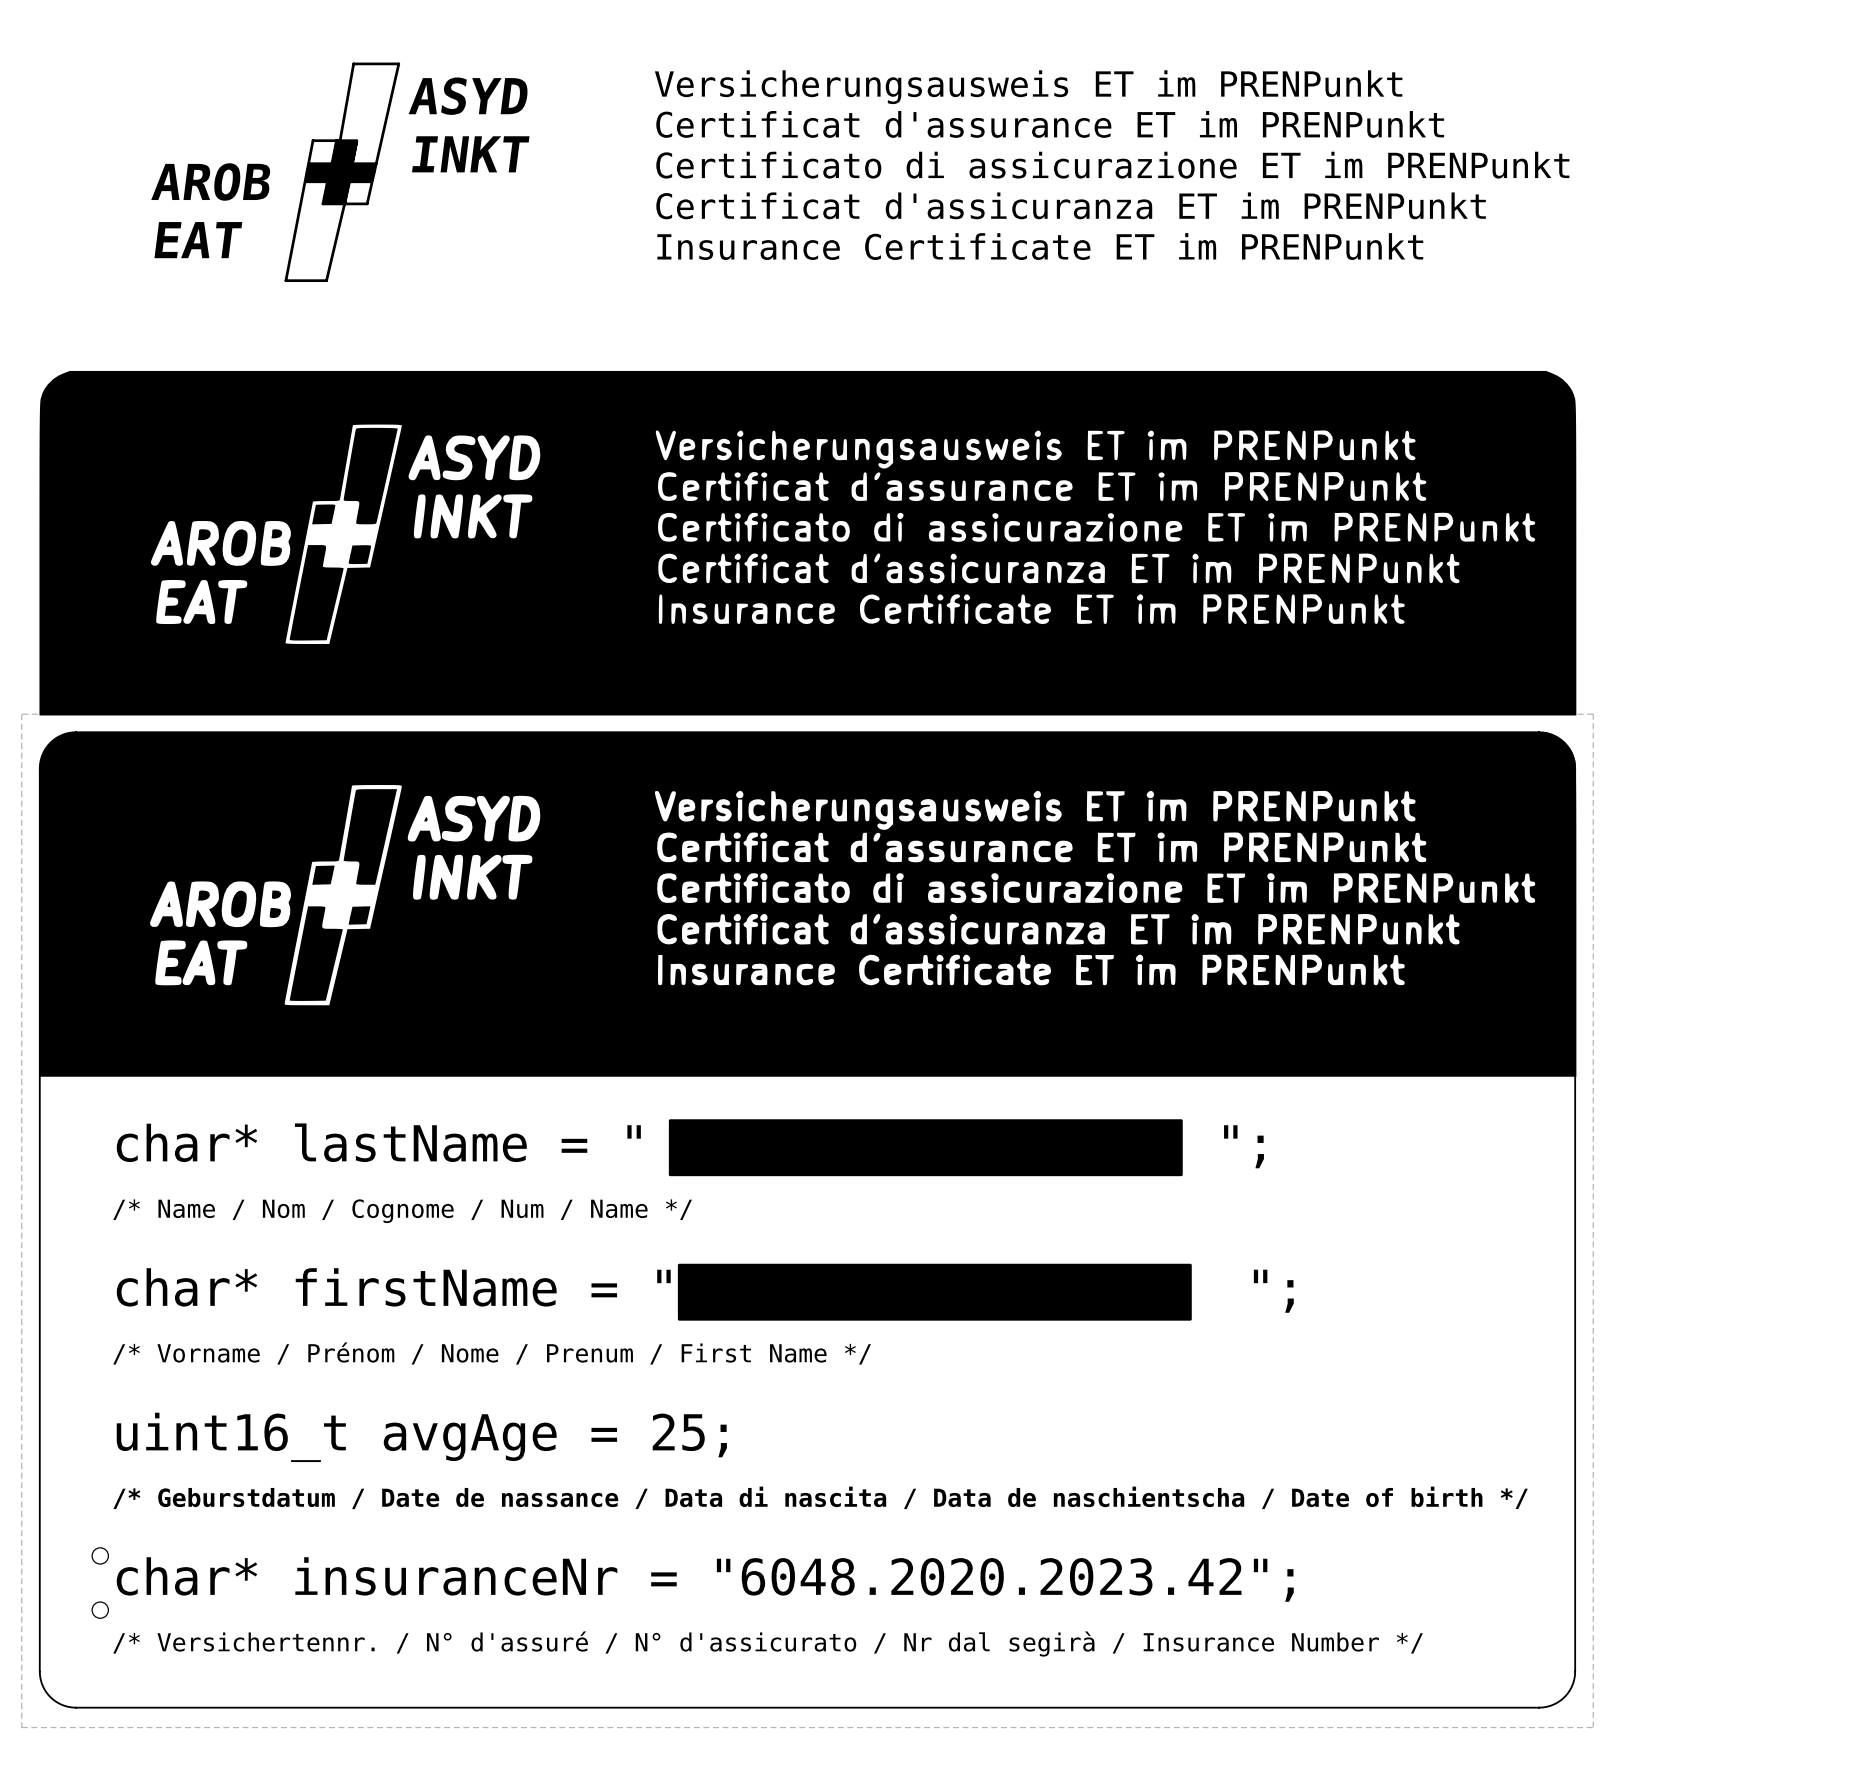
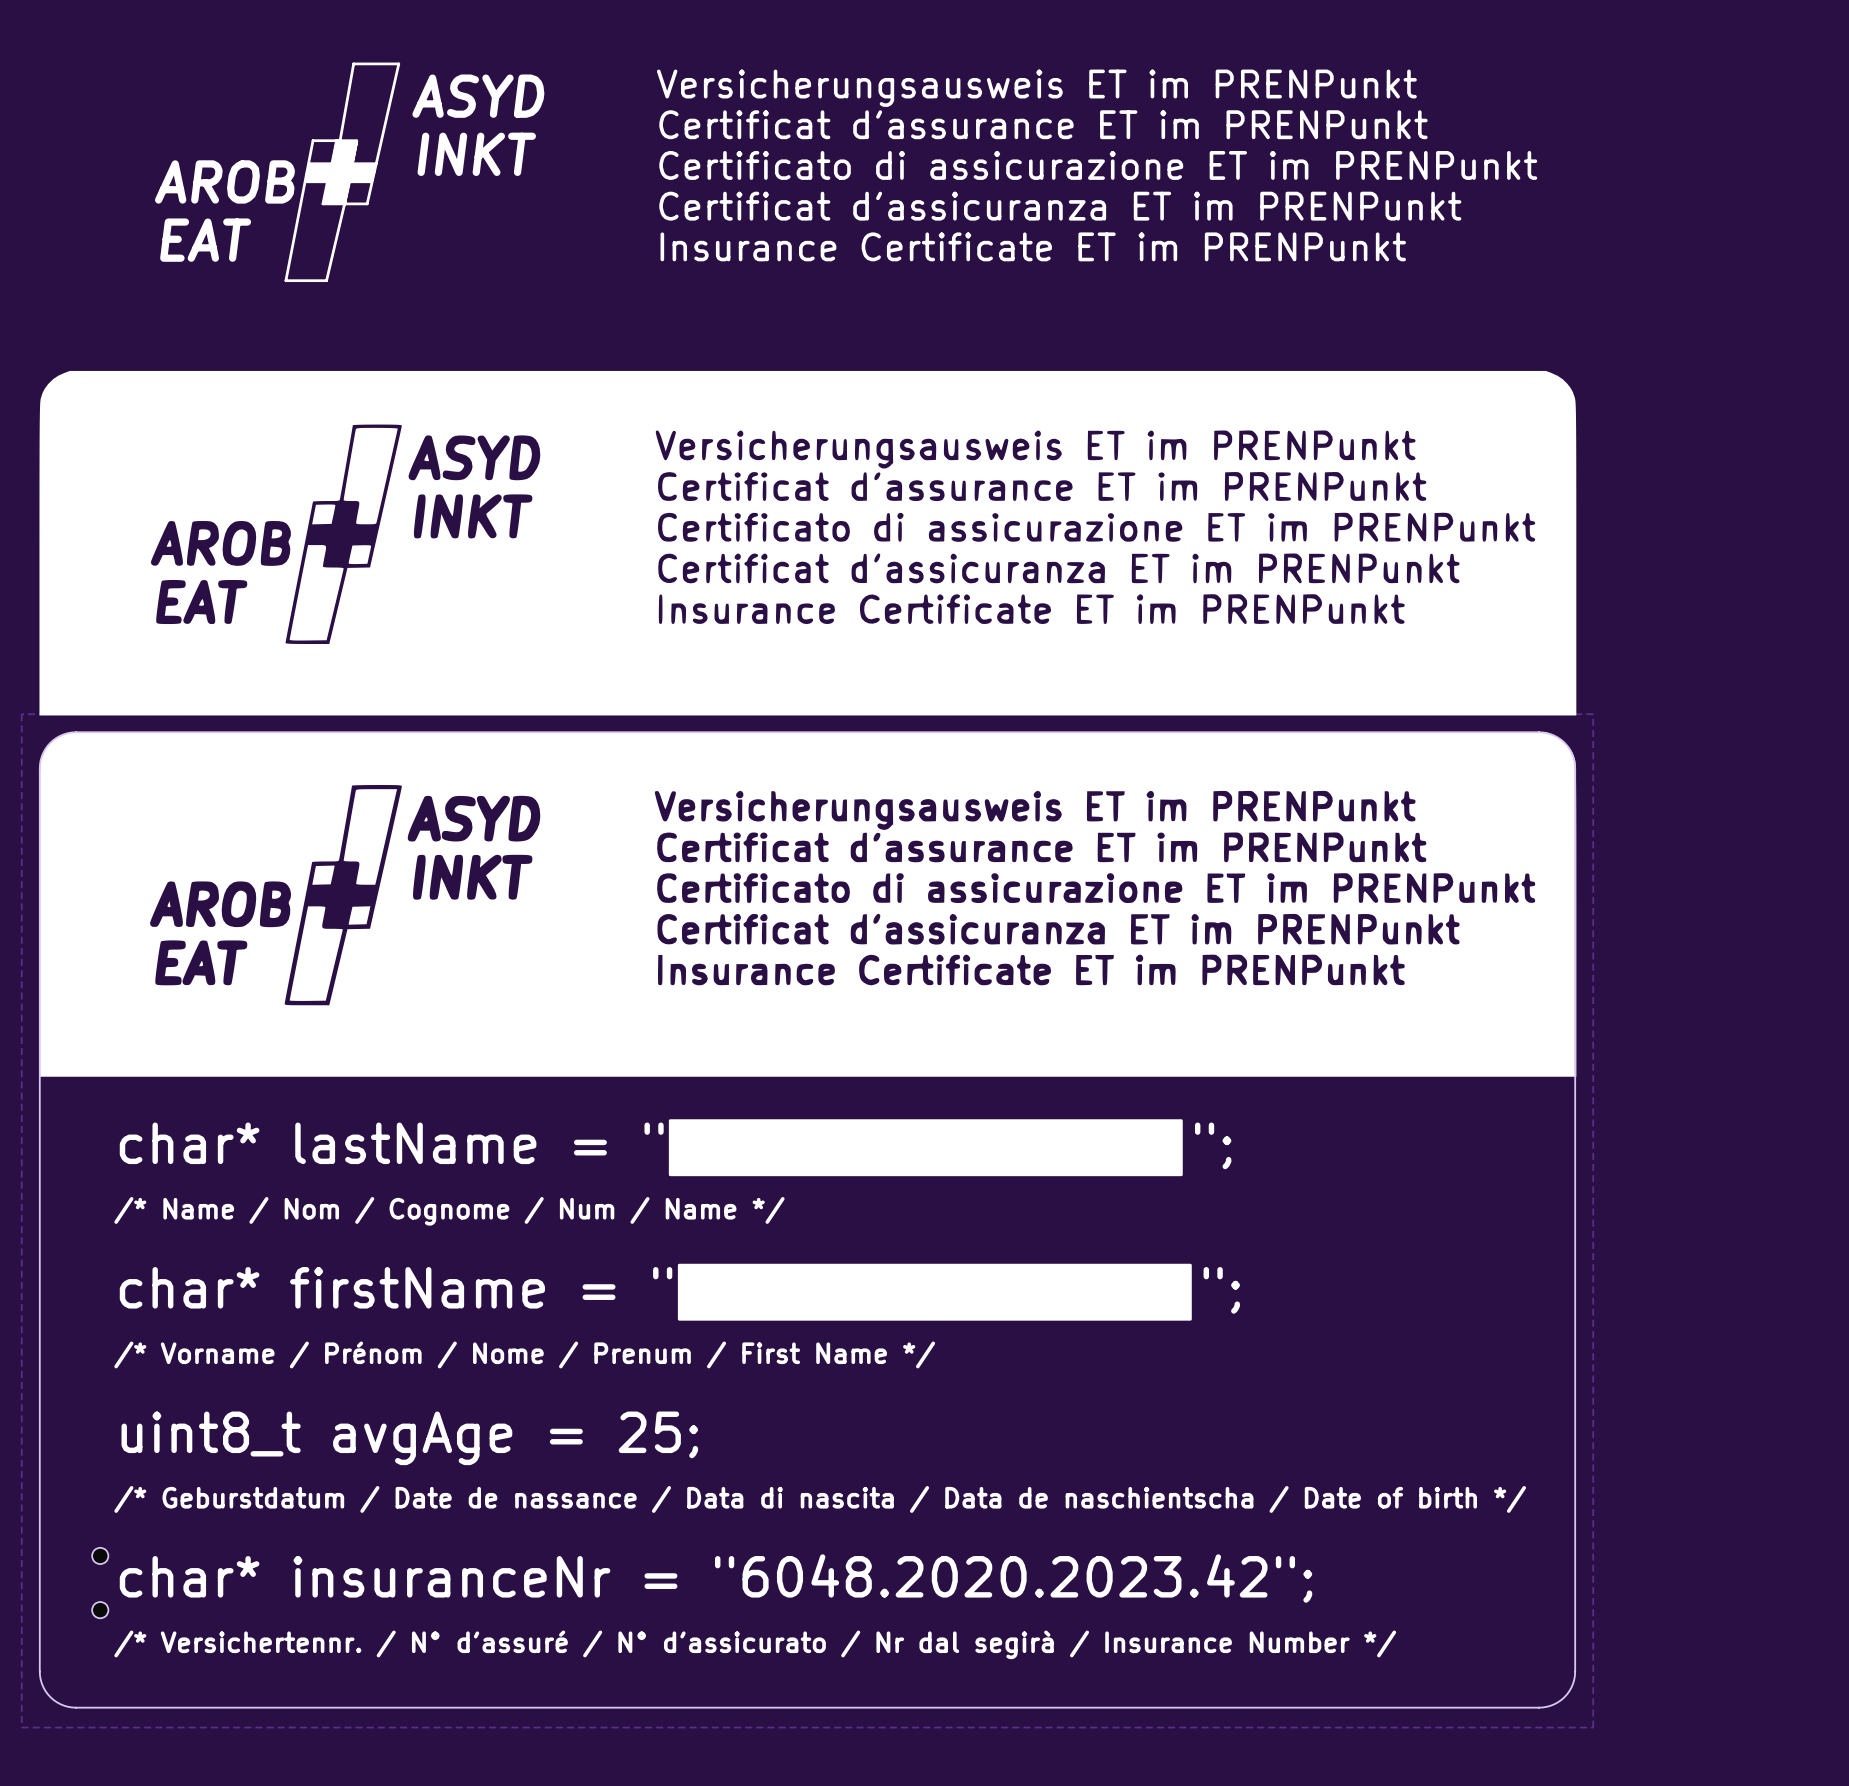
text: uint16_t avgAge = 25; (421, 1437) -> uint8_t avgAge = 25; (409, 1438)

